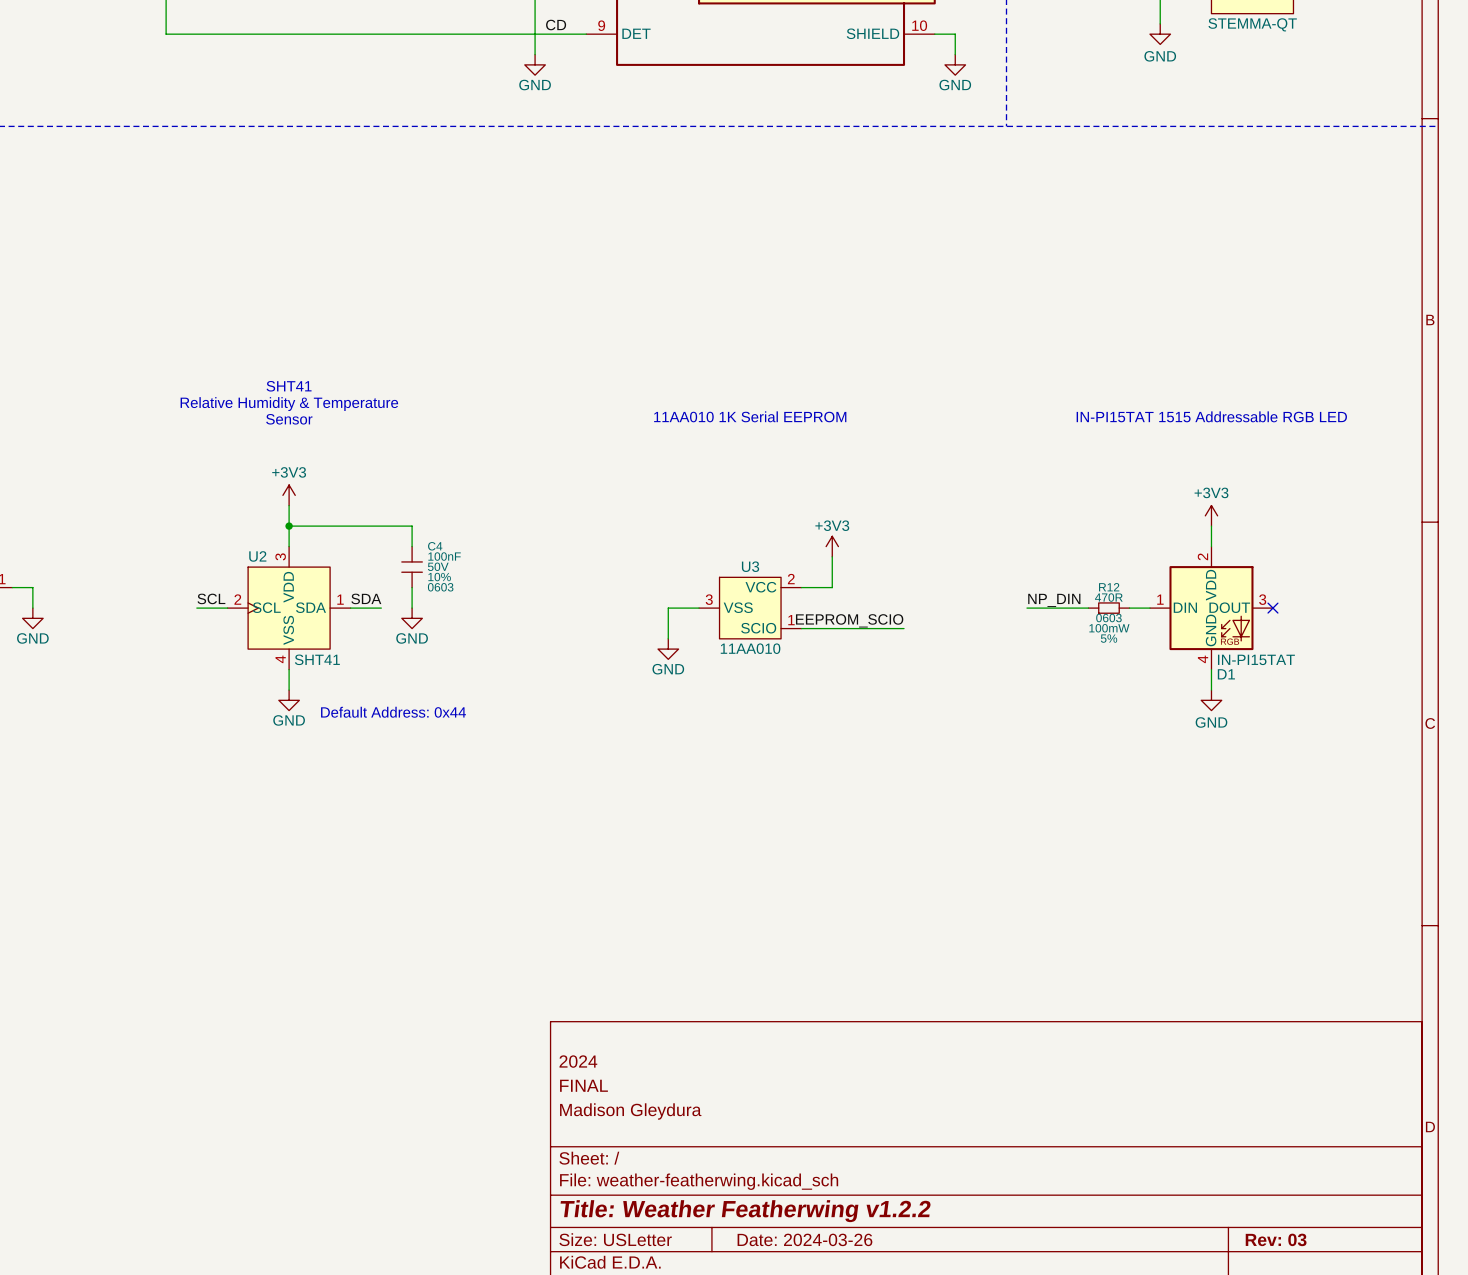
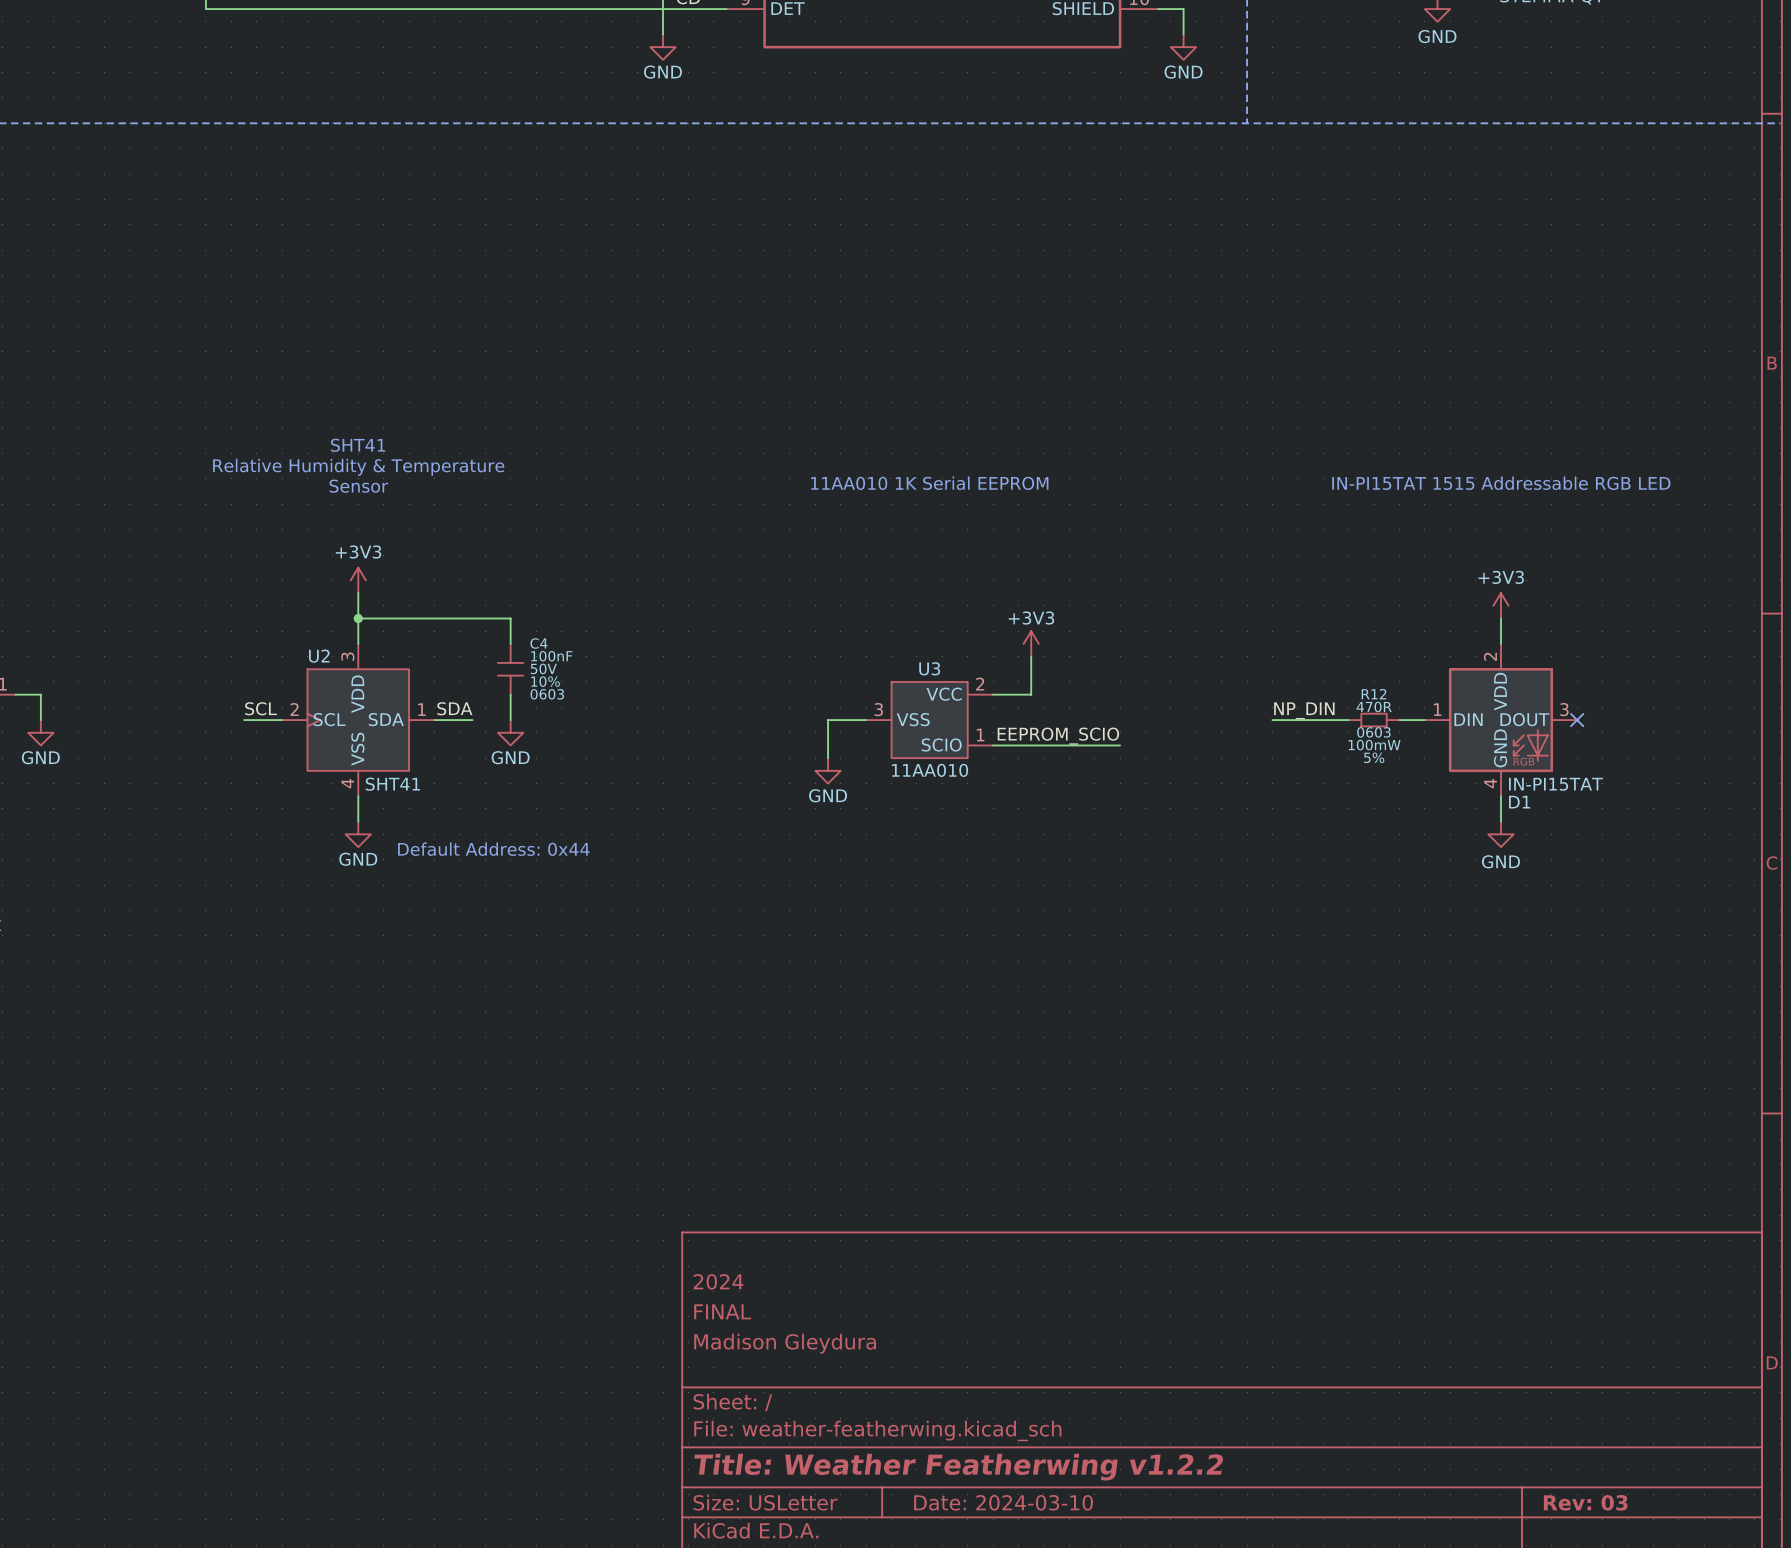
title block: Date: 2024-03-26 (804, 1239) -> Date: 2024-03-10 (1003, 1502)

